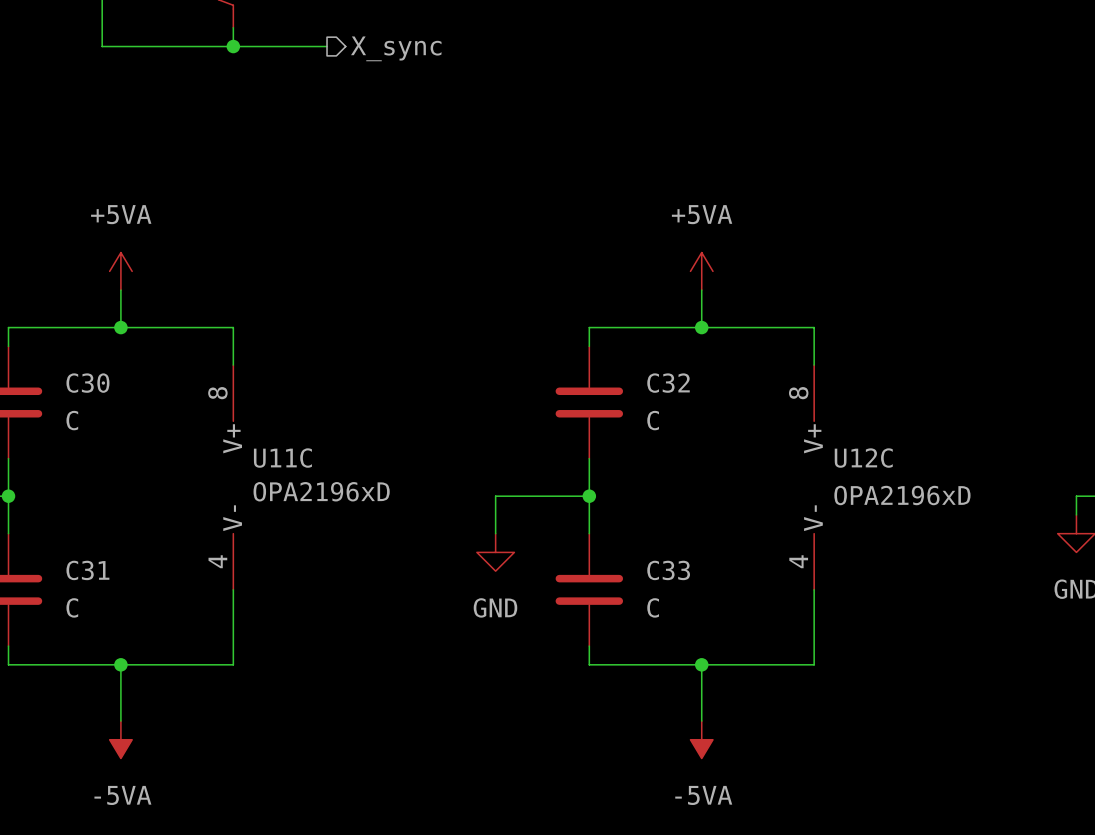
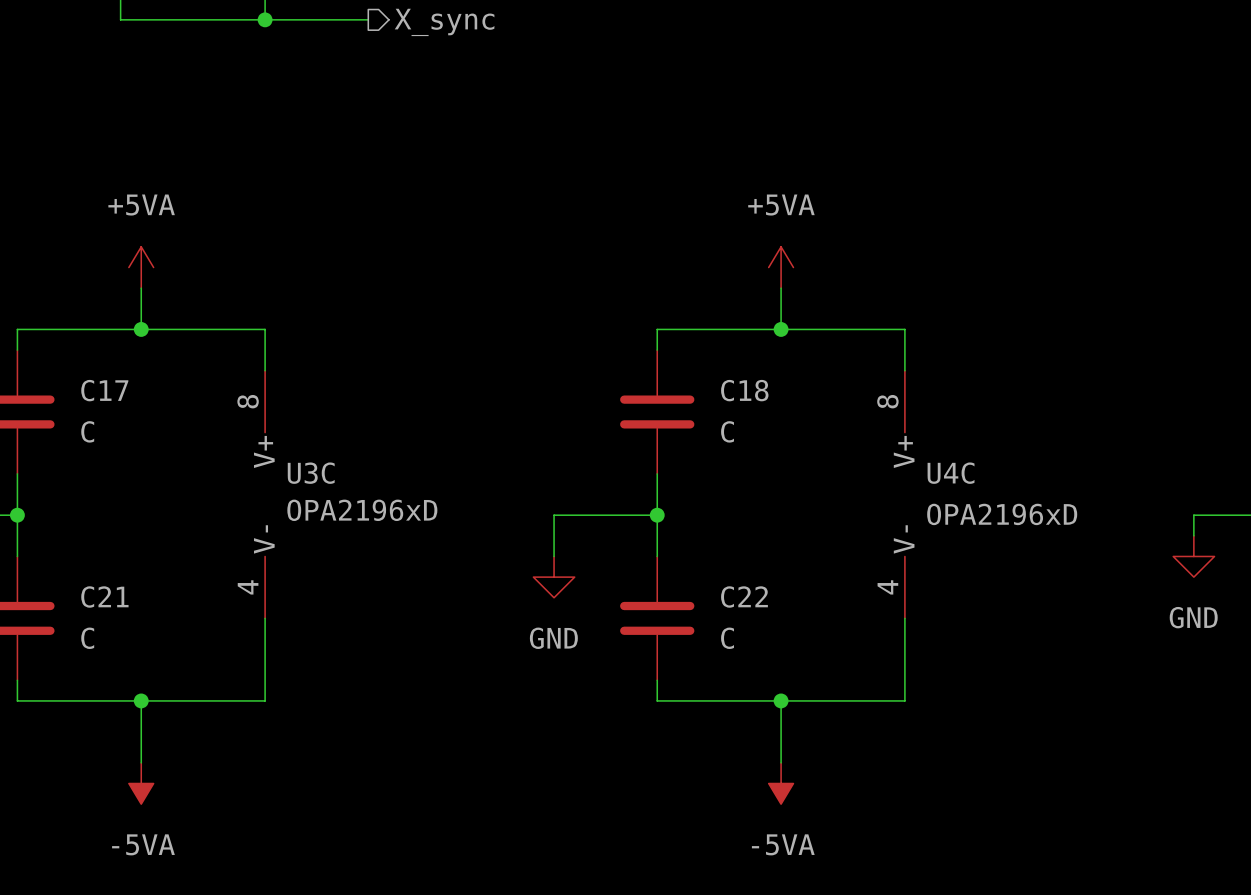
C30 name: C30 (87, 383) -> C17 (104, 390)
C32 name: C32 (668, 383) -> C18 (744, 390)
U11C name: U11C (282, 458) -> U3C (311, 473)
U12C name: U12C (863, 458) -> U4C (951, 473)
C31 name: C31 (87, 570) -> C21 (104, 597)
C33 name: C33 (668, 570) -> C22 (744, 597)

